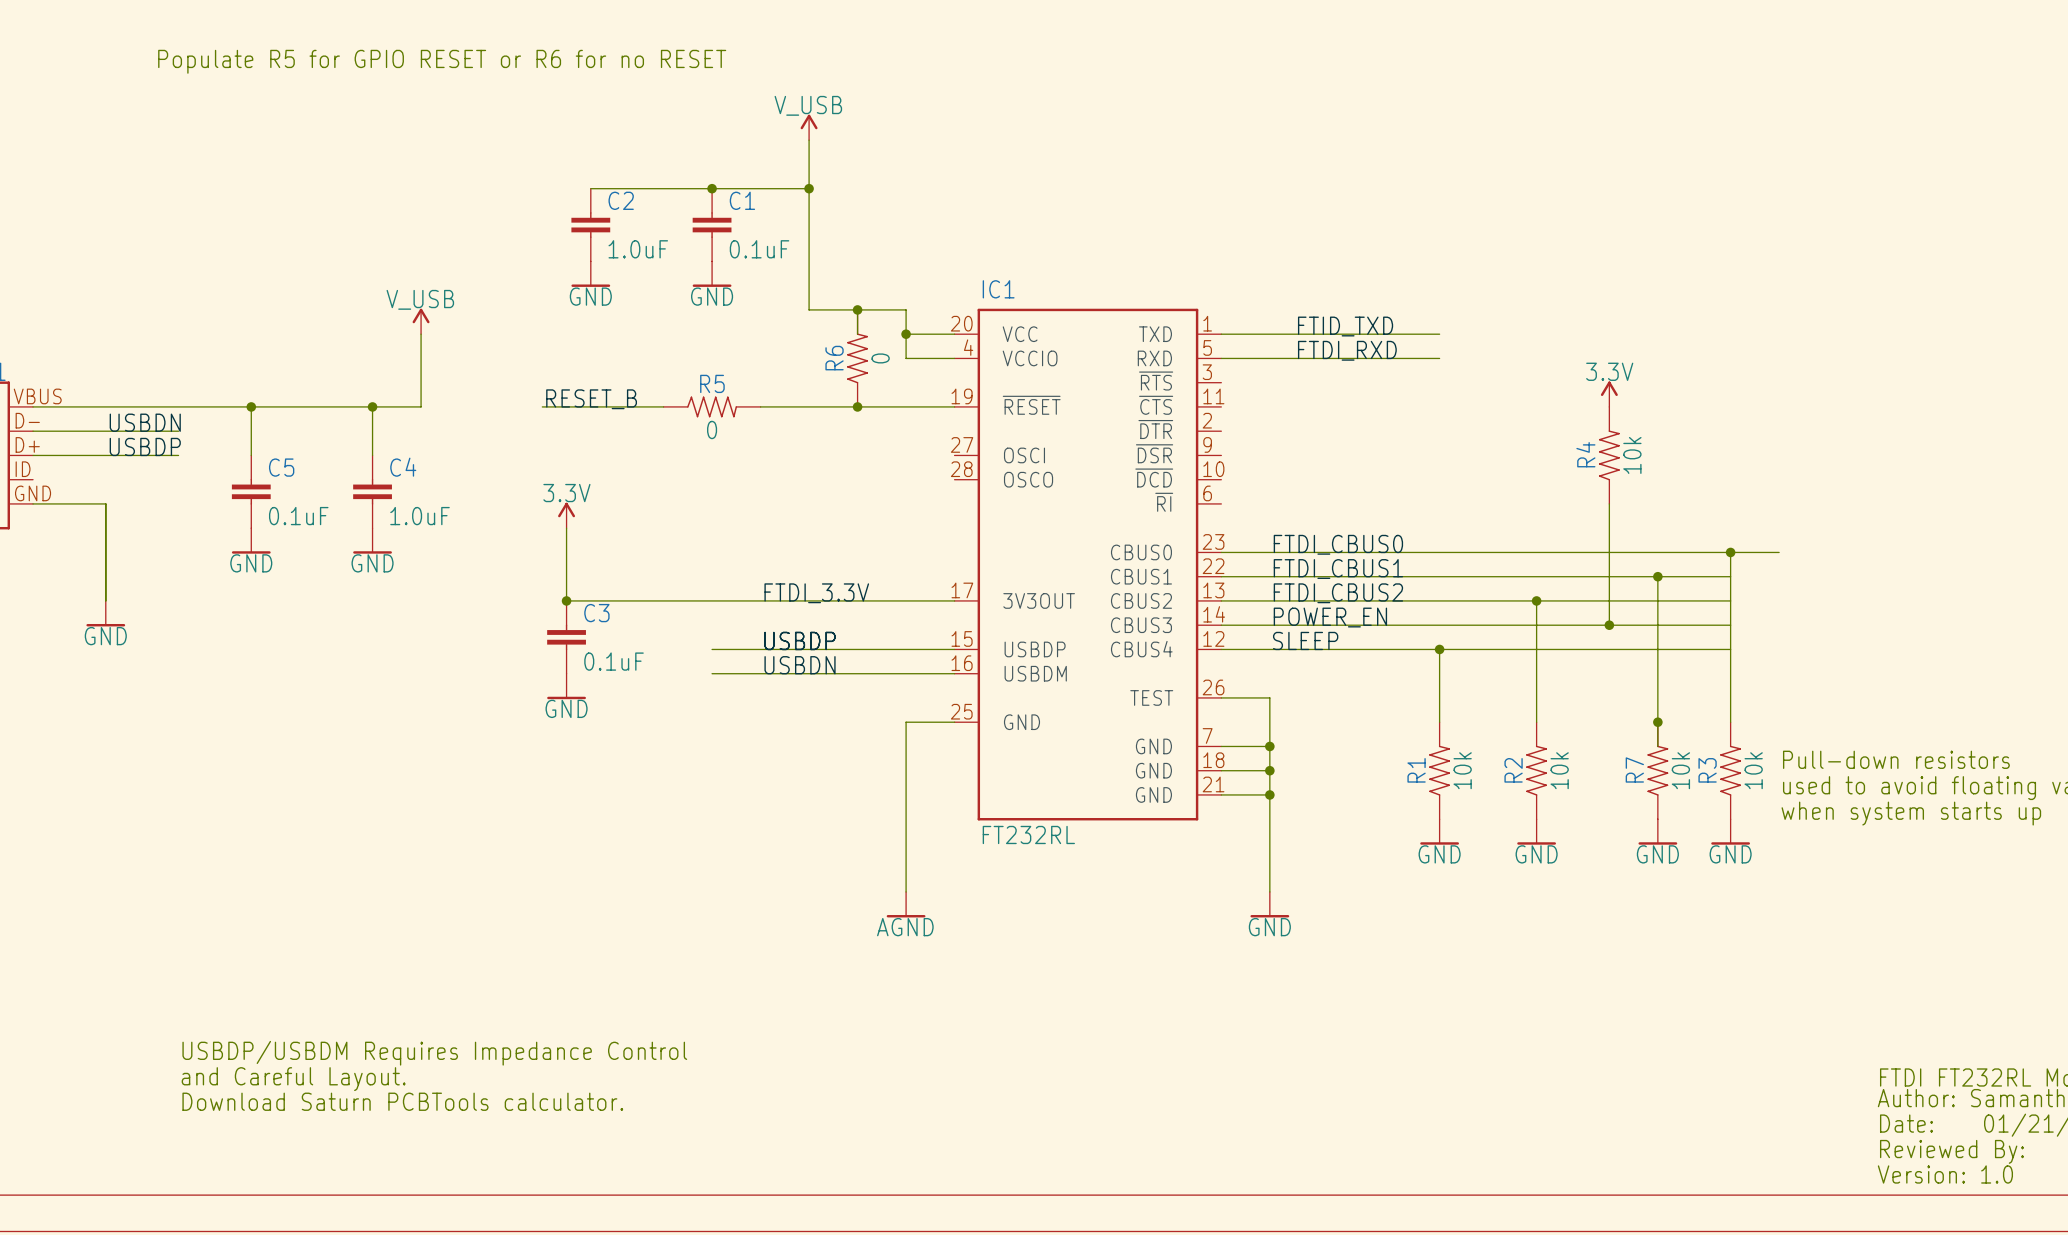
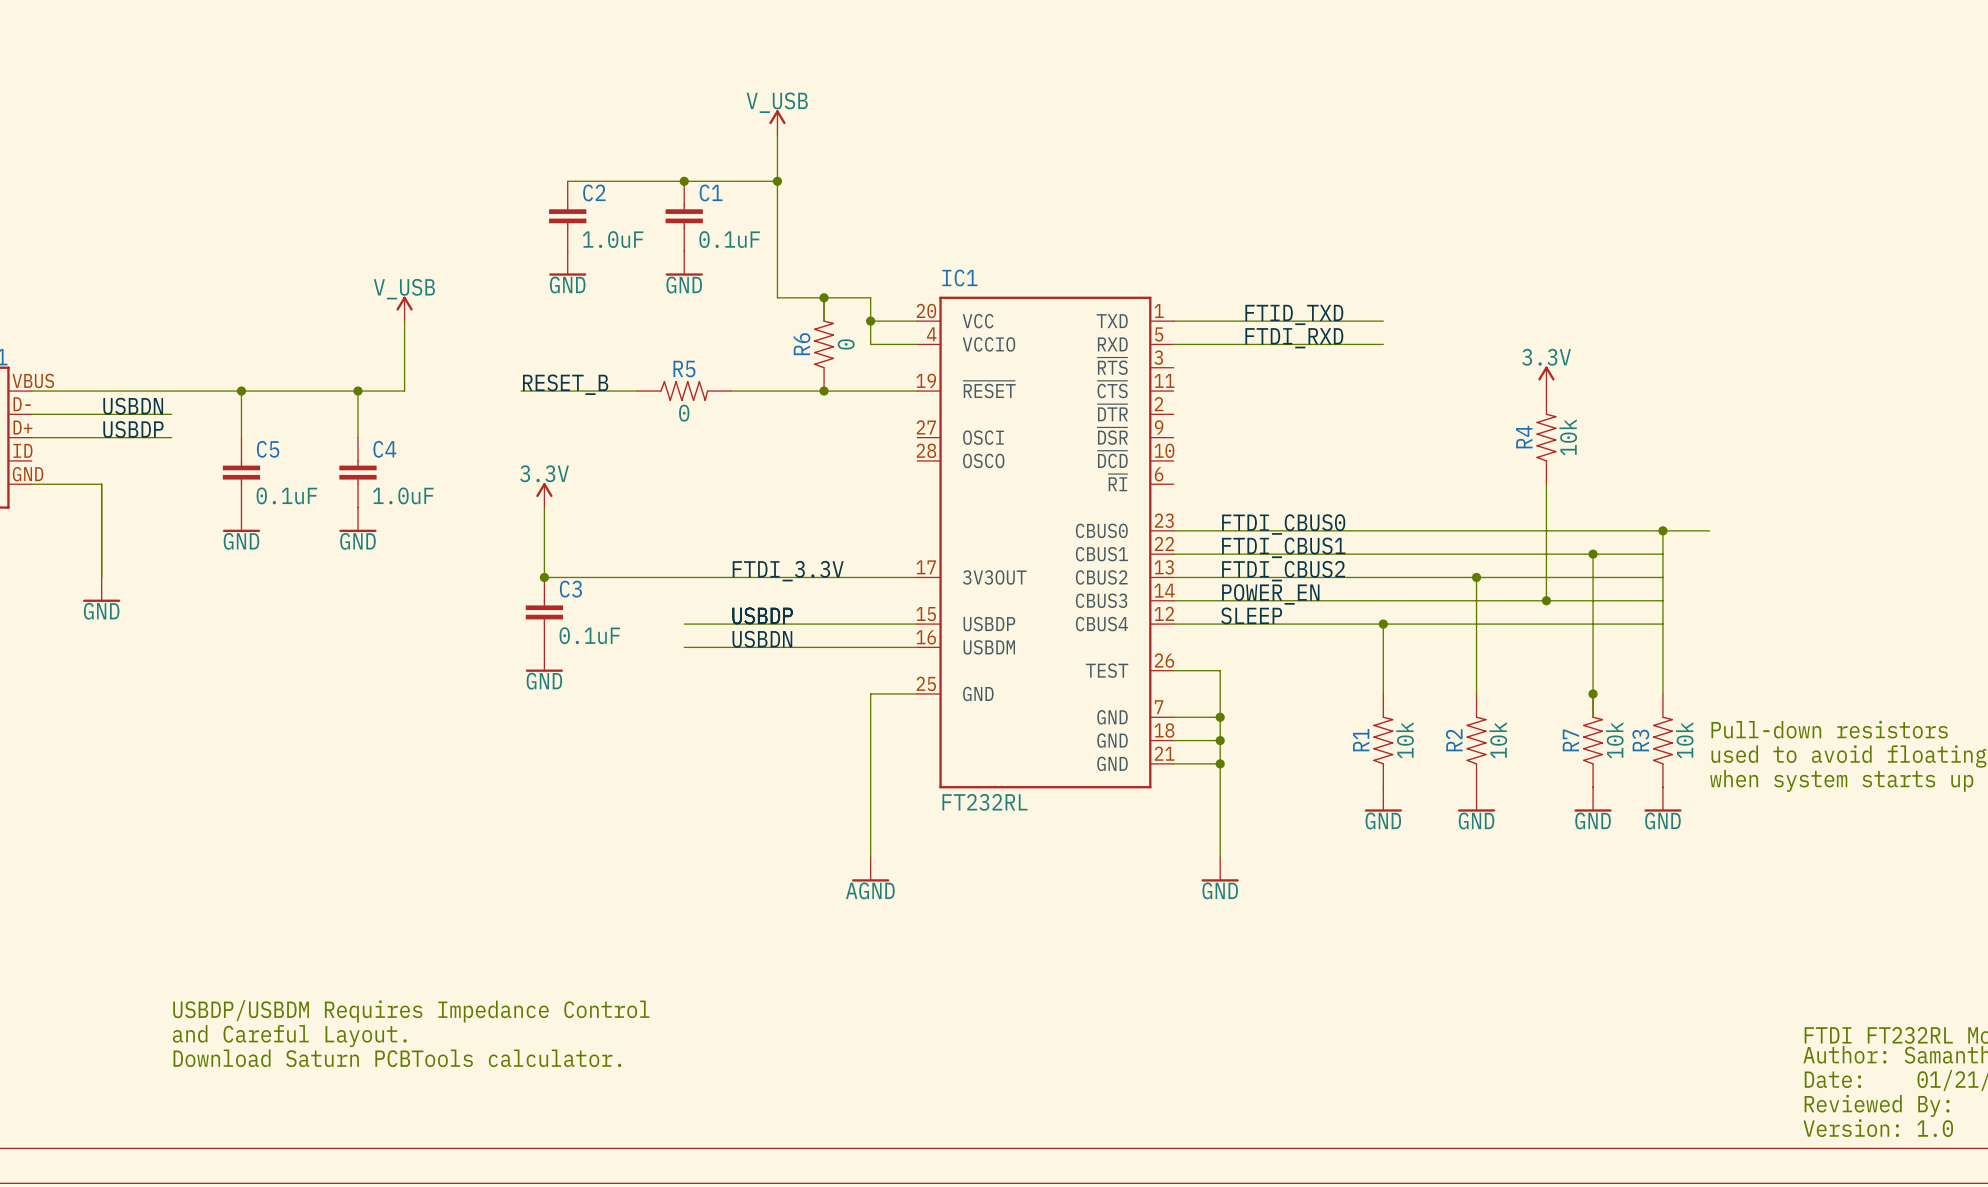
text: Populate R5 for GPIO RESET or R6 for no RESET (442, 61) -> none

